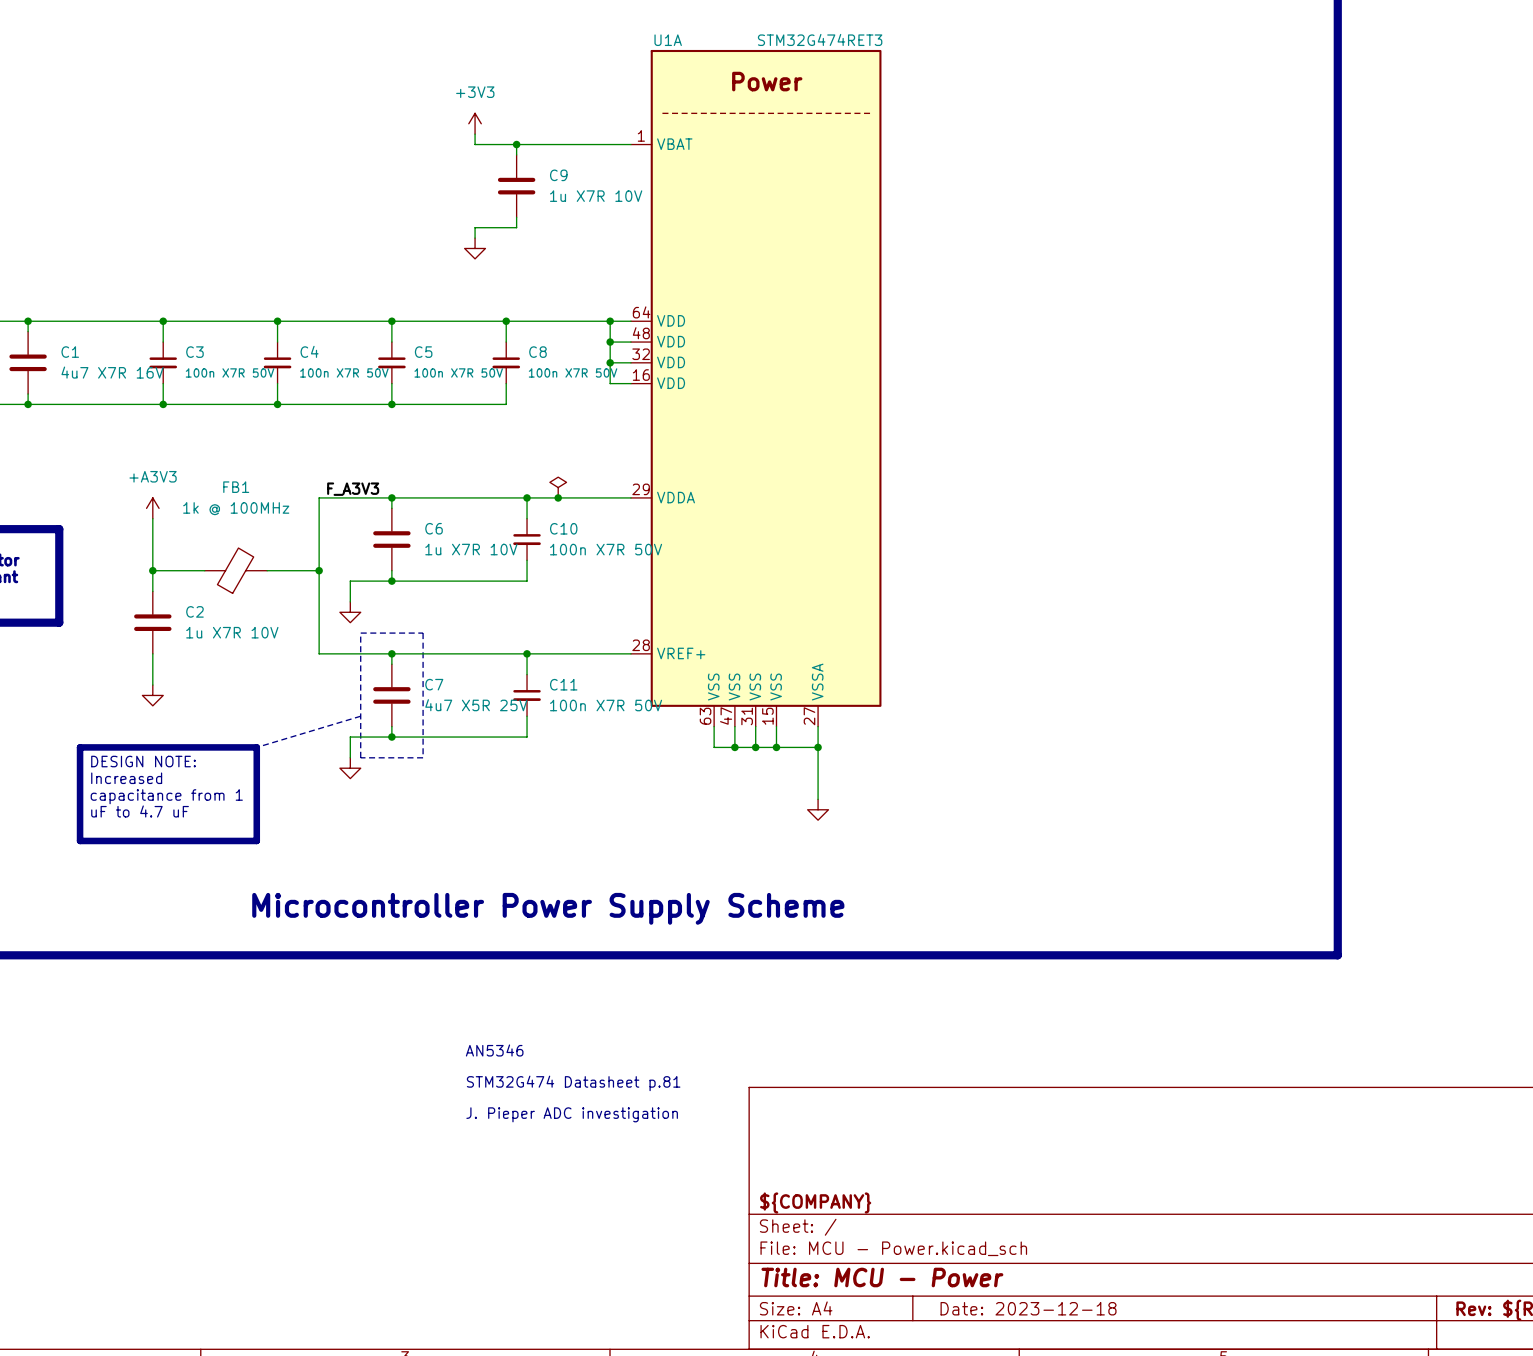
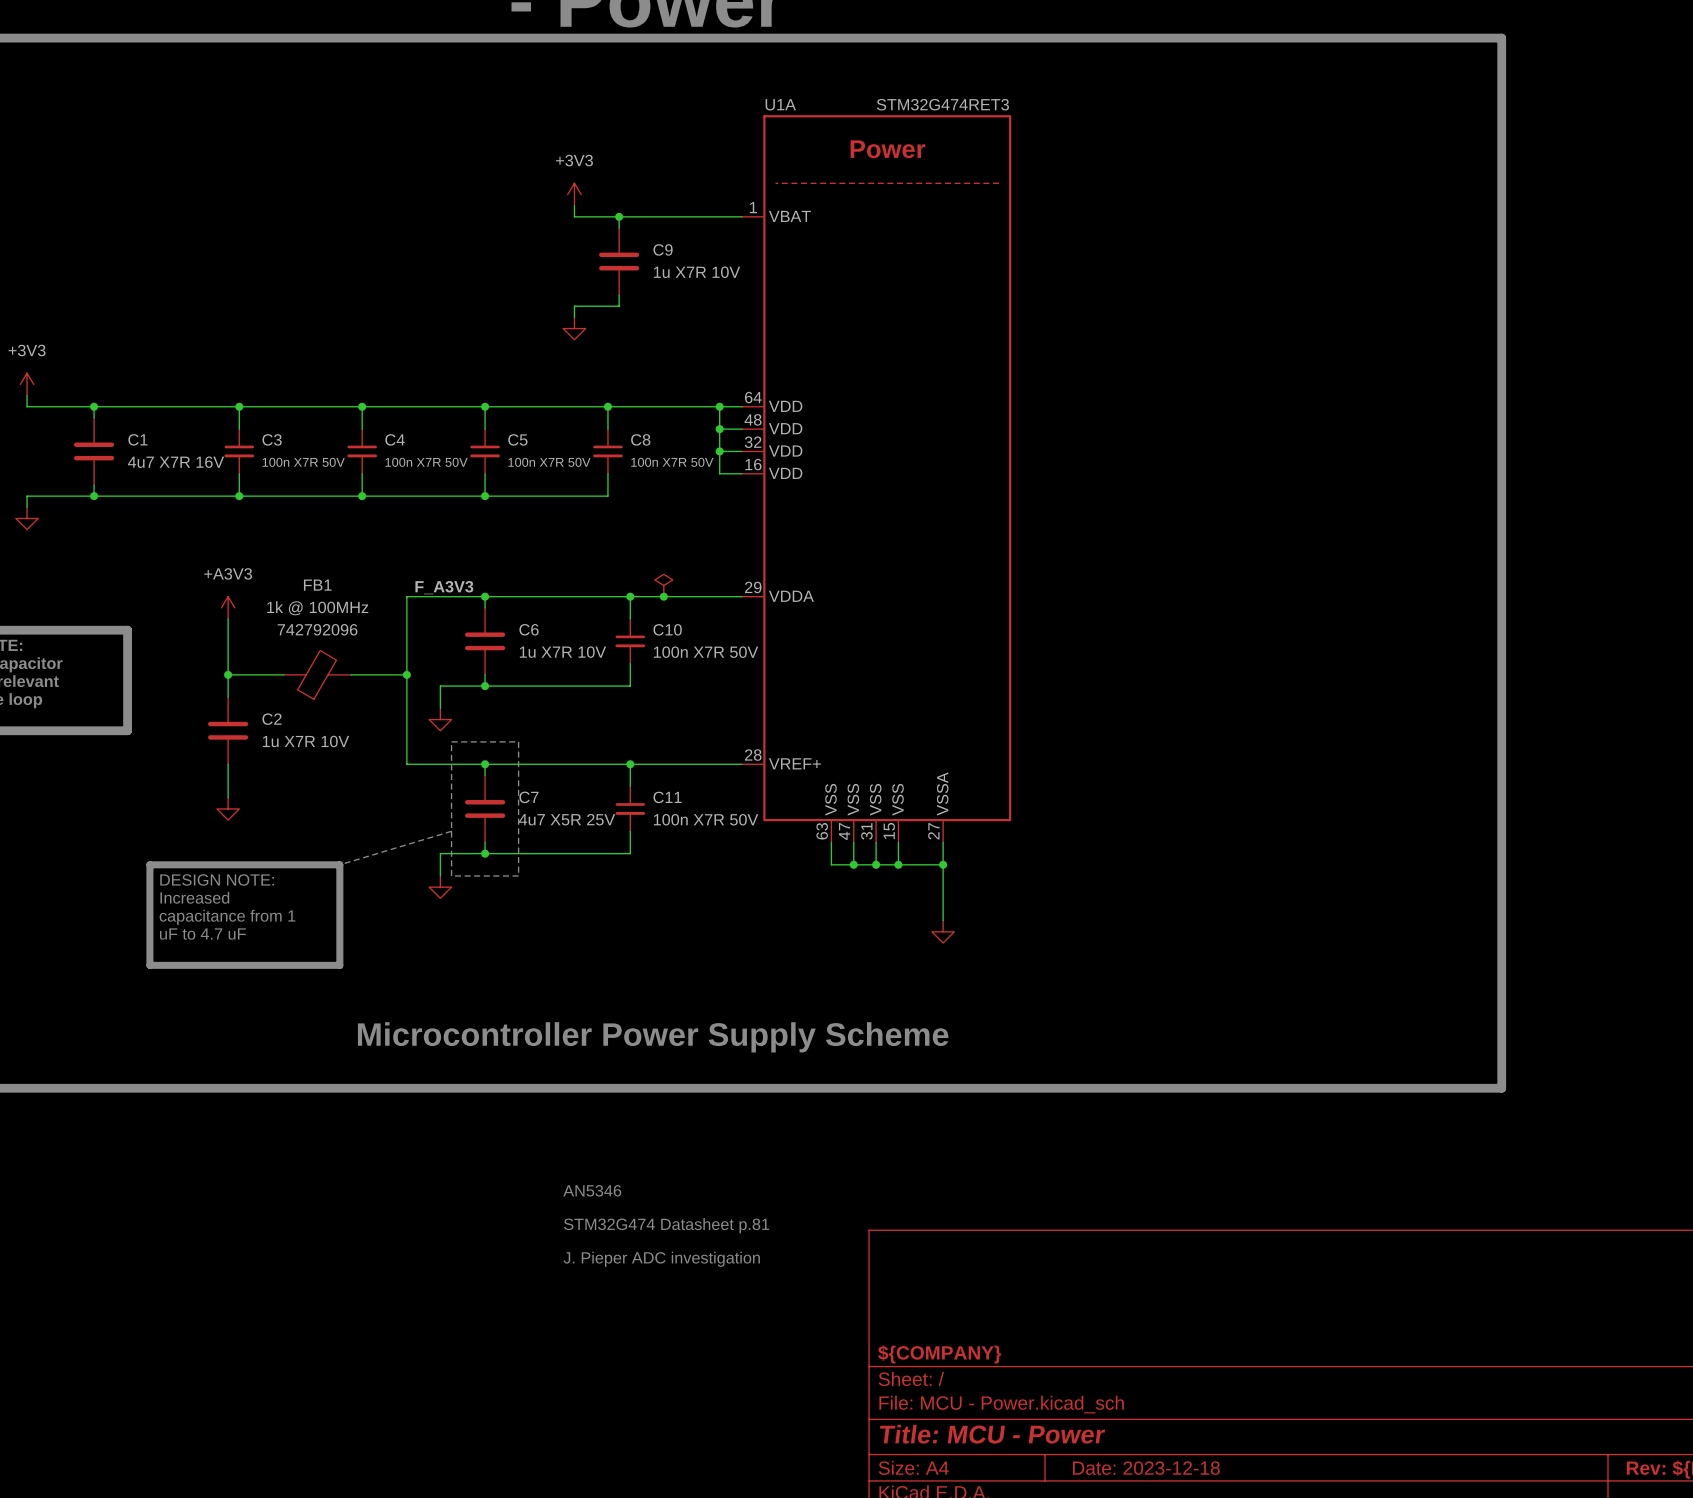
FB1 text: none -> 742792096 (317, 629)

